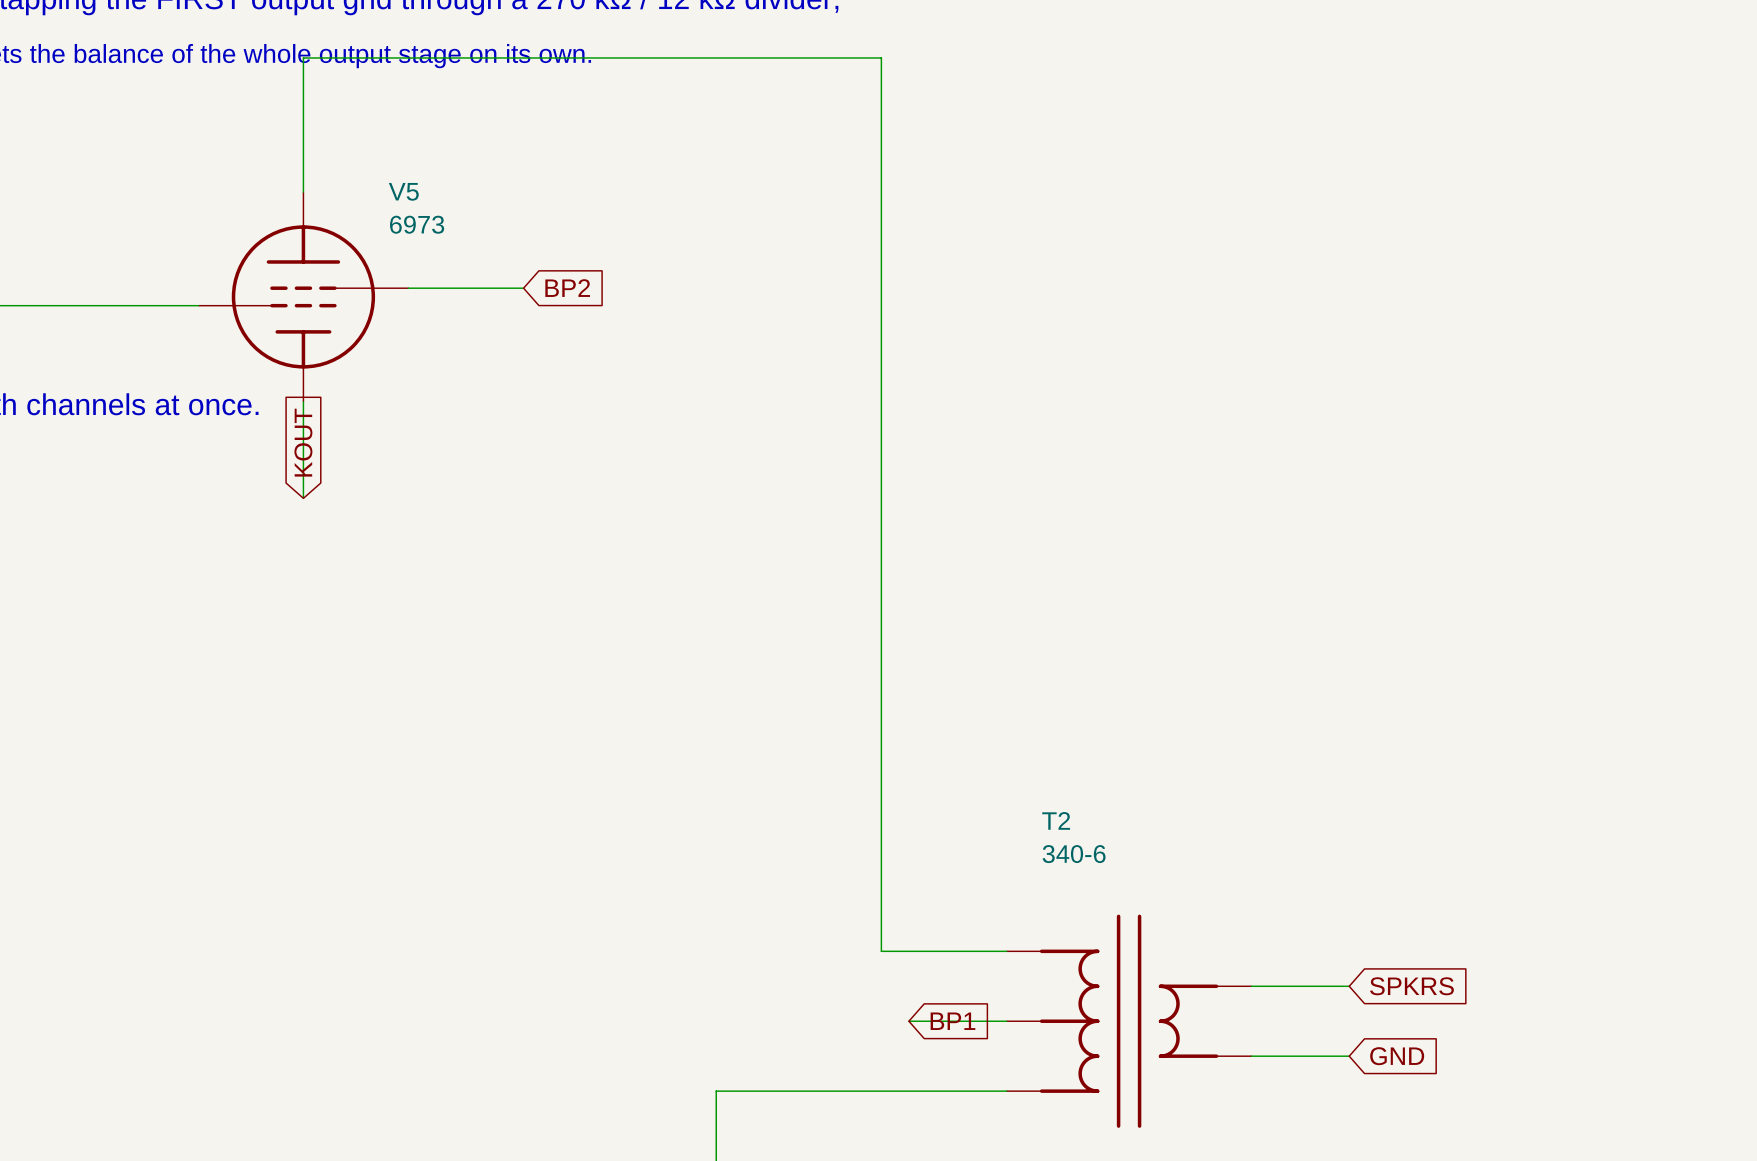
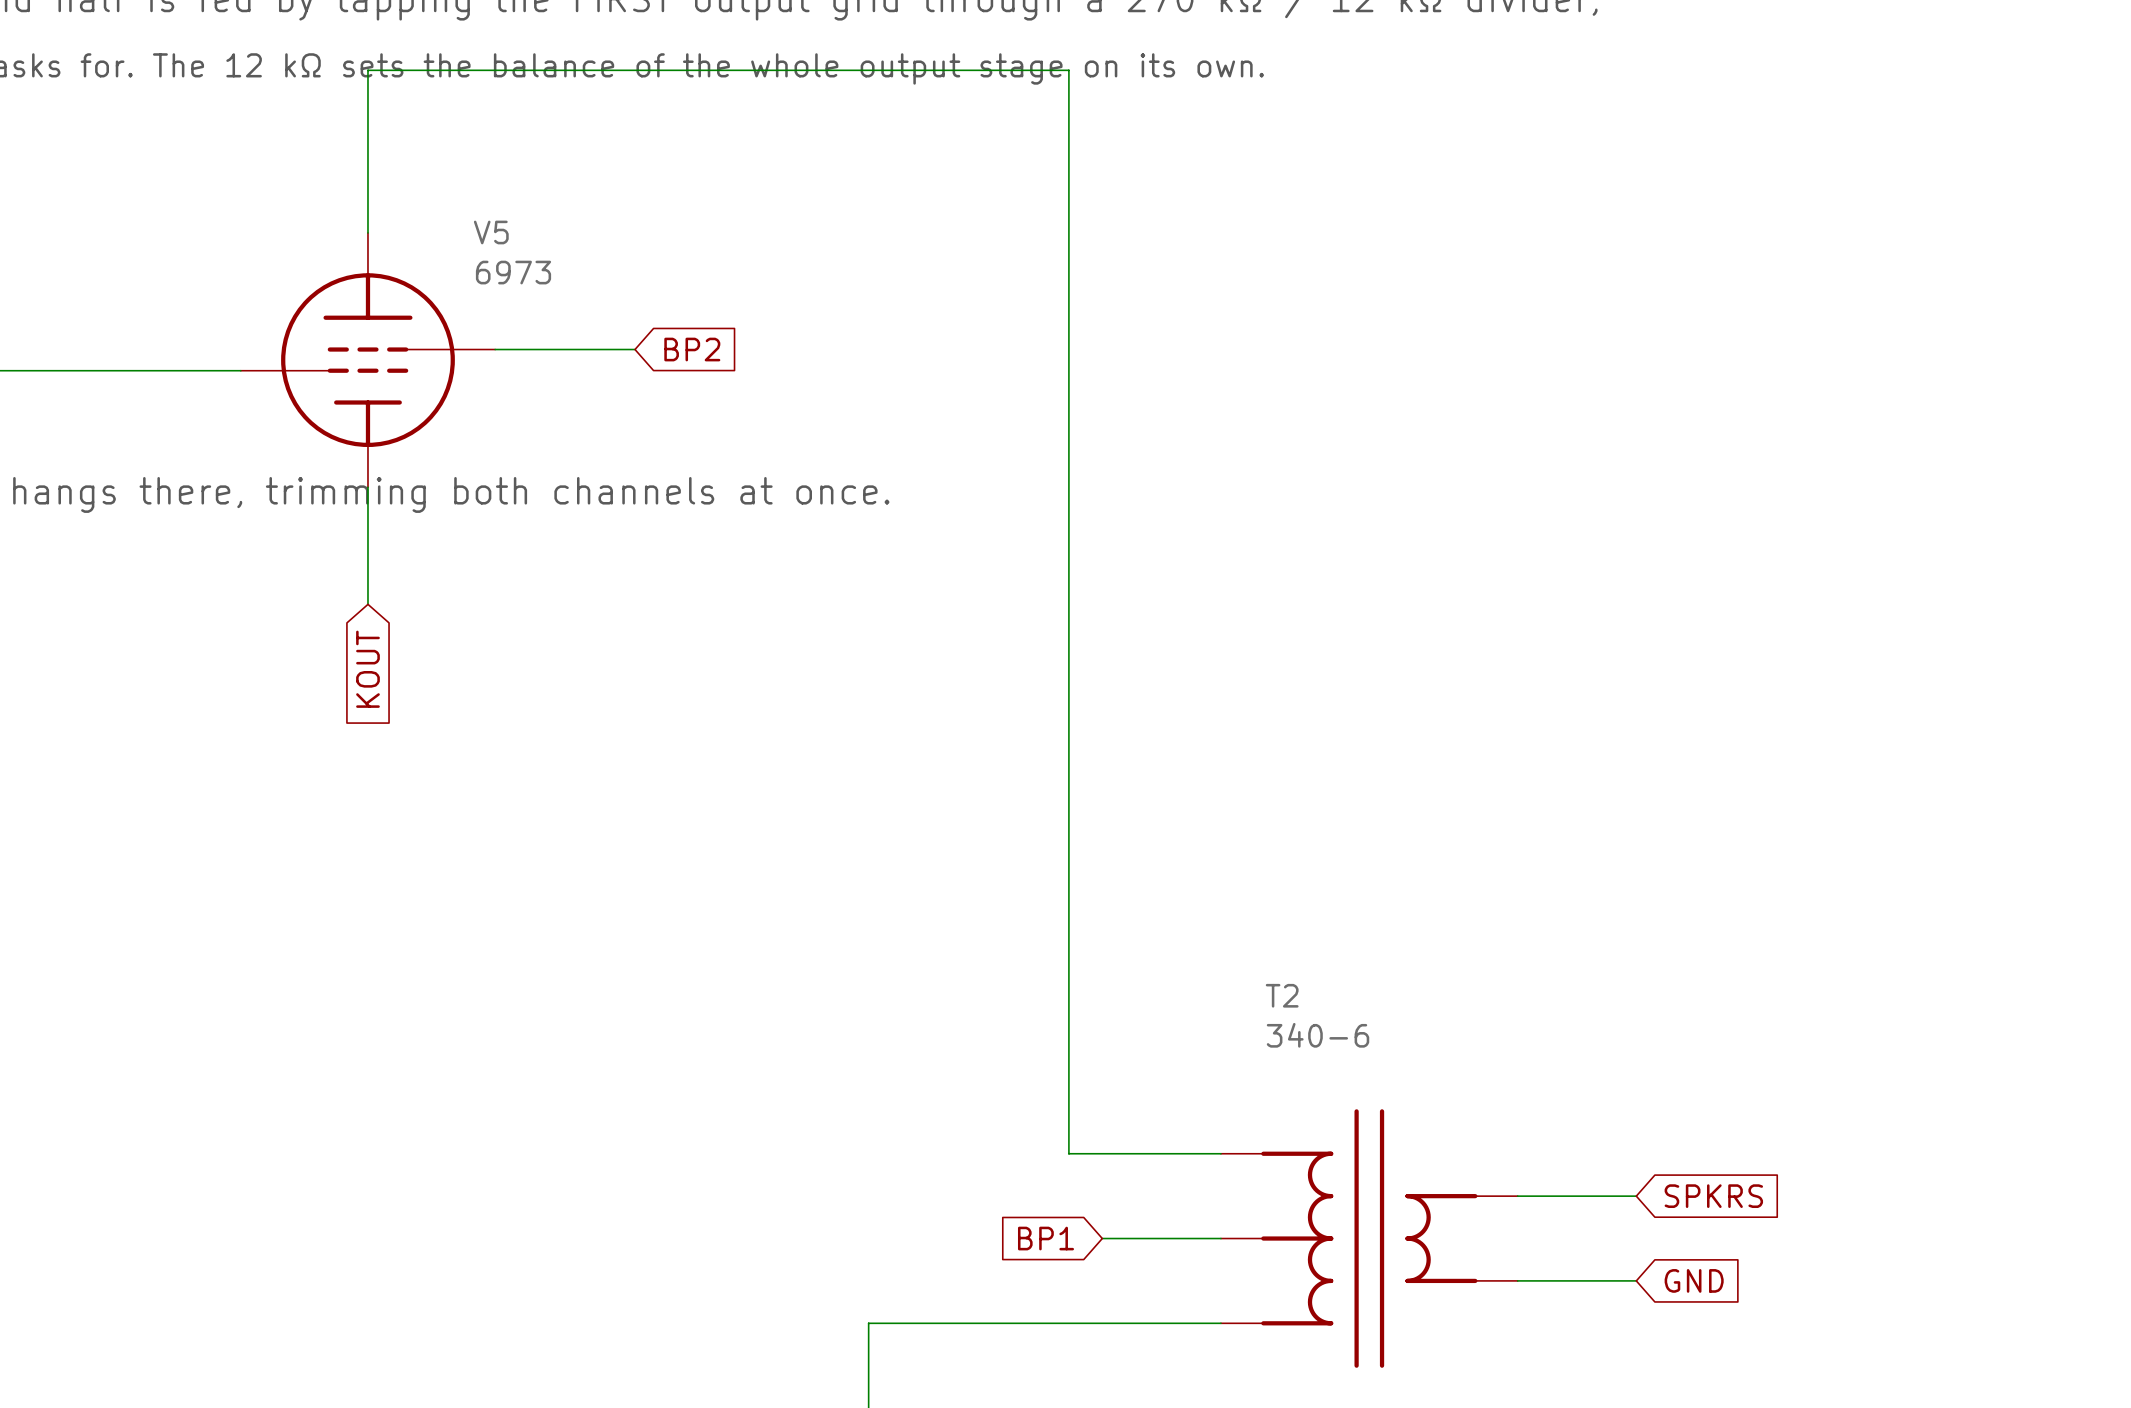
global label rotation: 0° (303, 442) -> 180° (367, 669)
global label rotation: 0° (952, 1021) -> 180° (1045, 1238)
global label position: BP1 (952, 1021) -> BP1 (1045, 1238)

